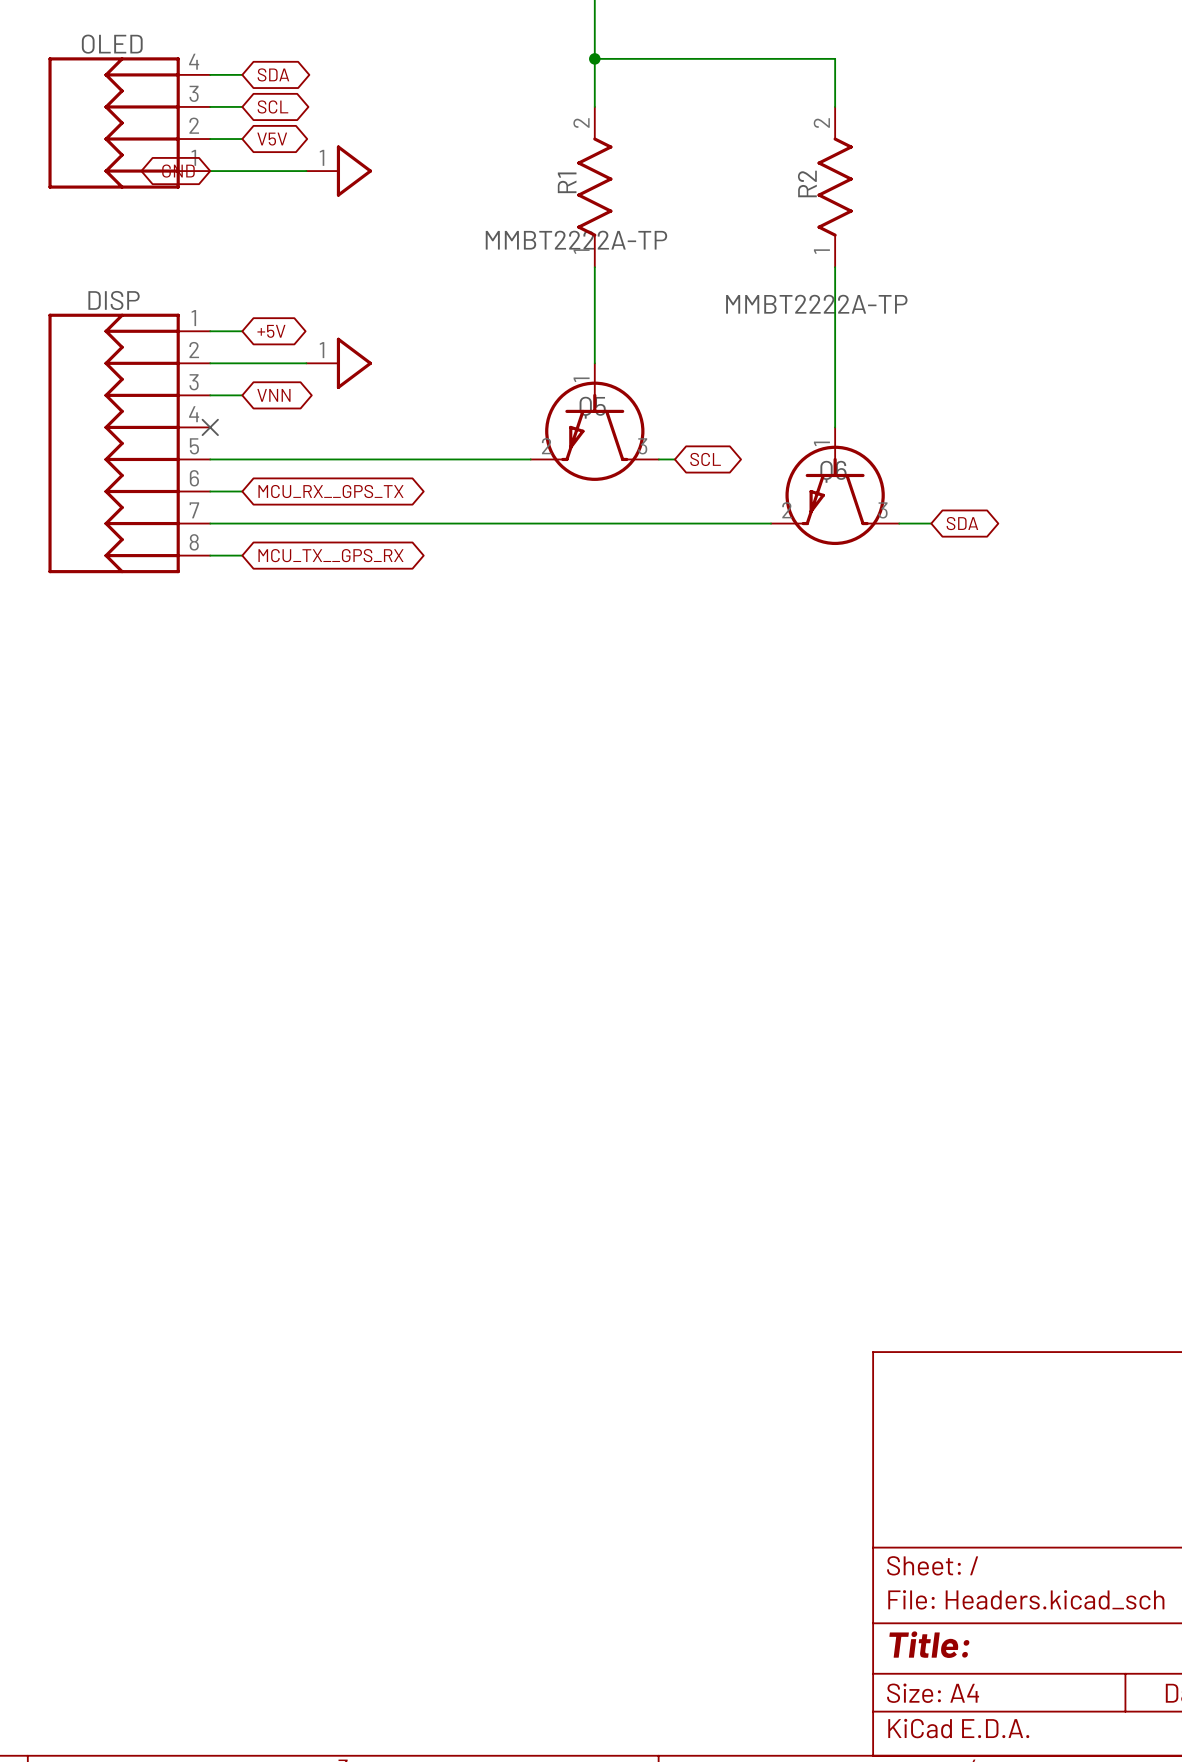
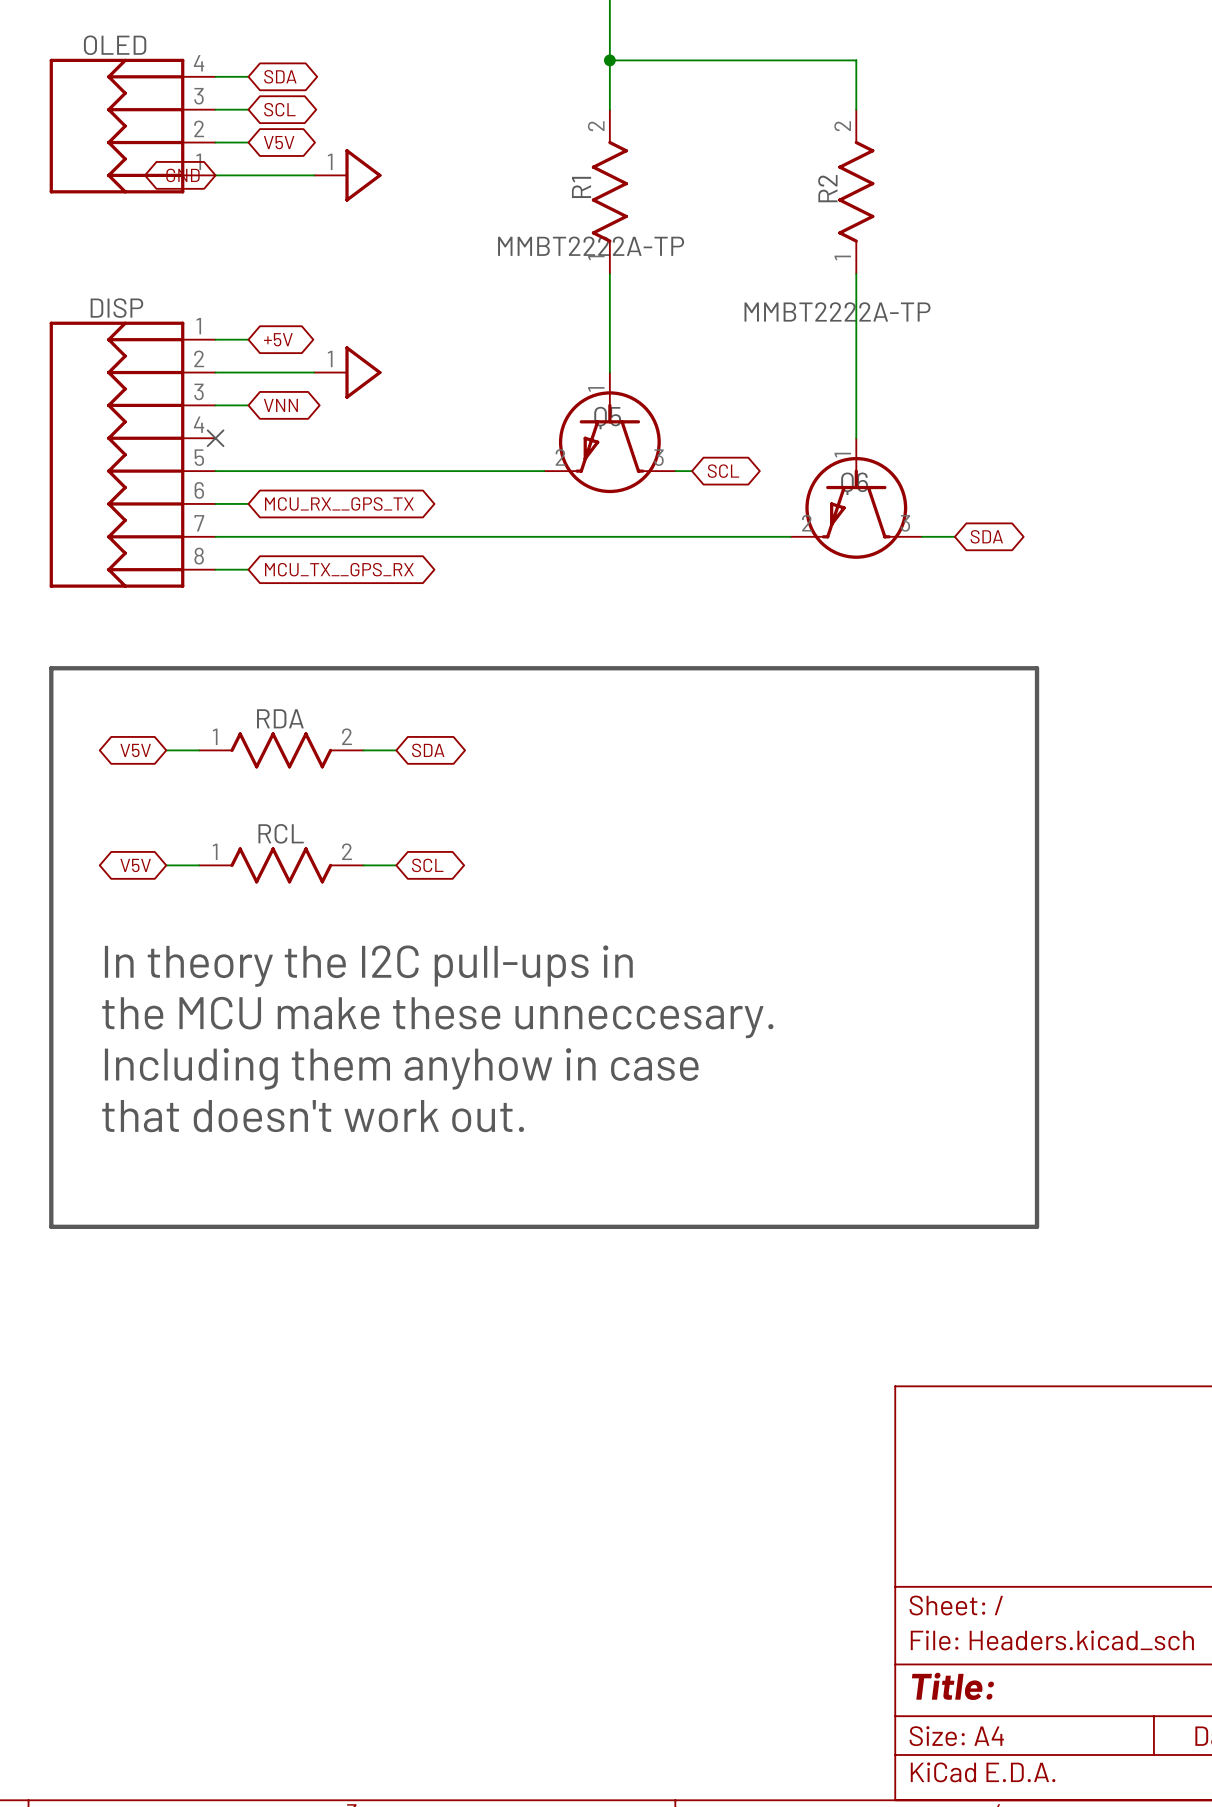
line: none -> (51, 668) (51, 1226) (1037, 1226) (1037, 668) (51, 668)
text: none -> RDA (280, 718)
global label: none -> V5V (135, 750)
wire: none -> (166, 750) (199, 750)
part: none -> (281, 750)
wire: none -> (363, 750) (396, 750)
global label: none -> SDA (428, 750)
text: none -> RCL (281, 833)
global label: none -> V5V (135, 865)
wire: none -> (166, 865) (199, 865)
part: none -> (281, 865)
wire: none -> (363, 865) (396, 865)
global label: none -> SCL (427, 865)
text: none -> In theory the I2C pull-ups in (368, 966)
text: none -> the MCU make these unneccesary. (437, 1017)
text: none -> Including them anyhow in case (401, 1068)
text: none -> that doesn't work out. (313, 1116)

